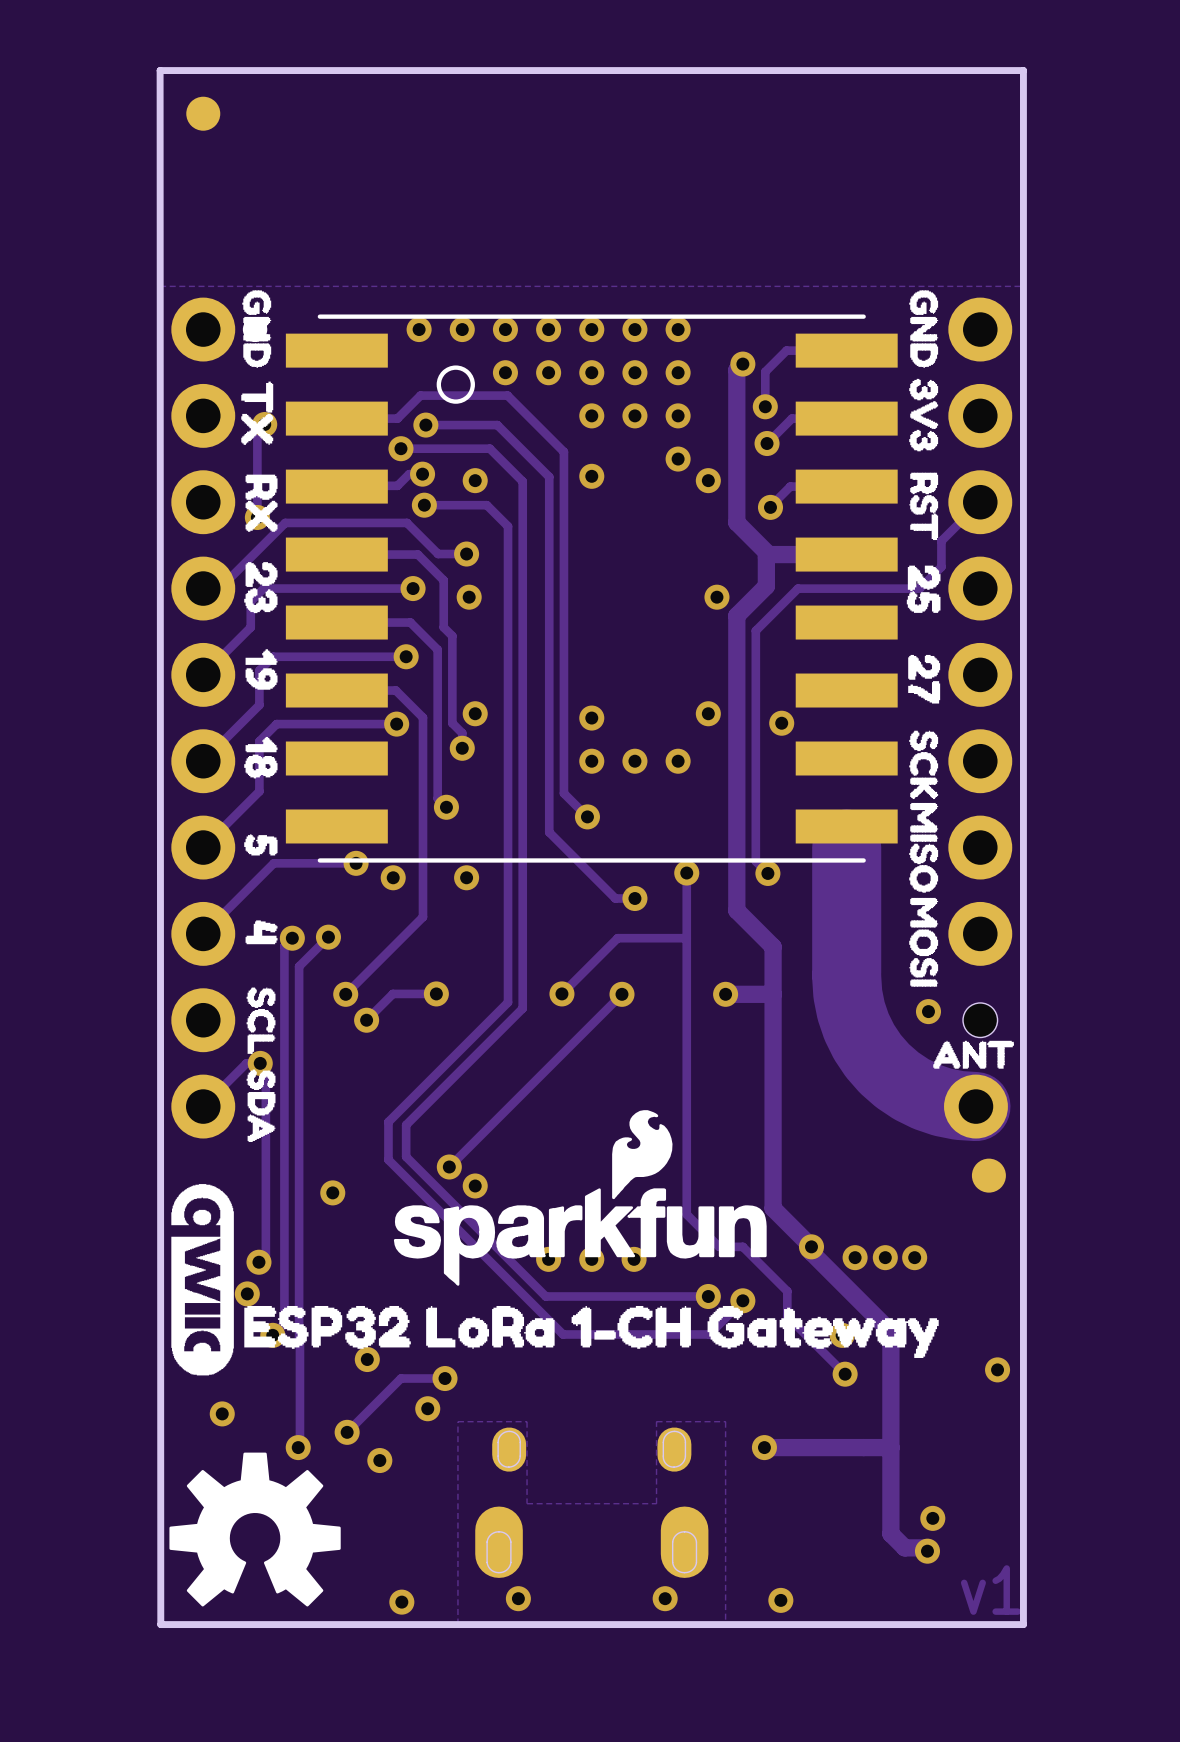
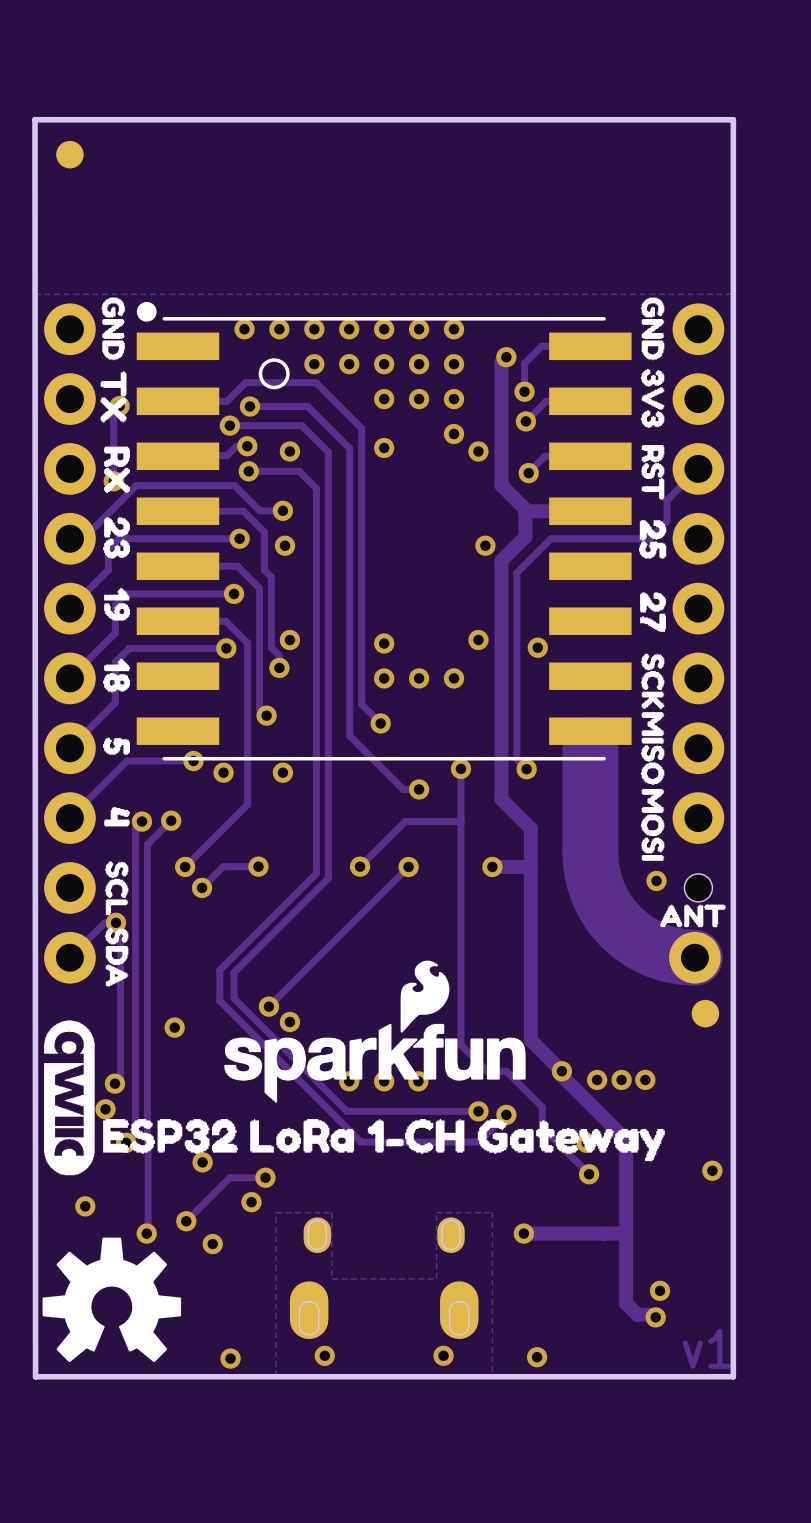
part footprint: [242, 314, 898, 863] -> [136, 301, 632, 761]

